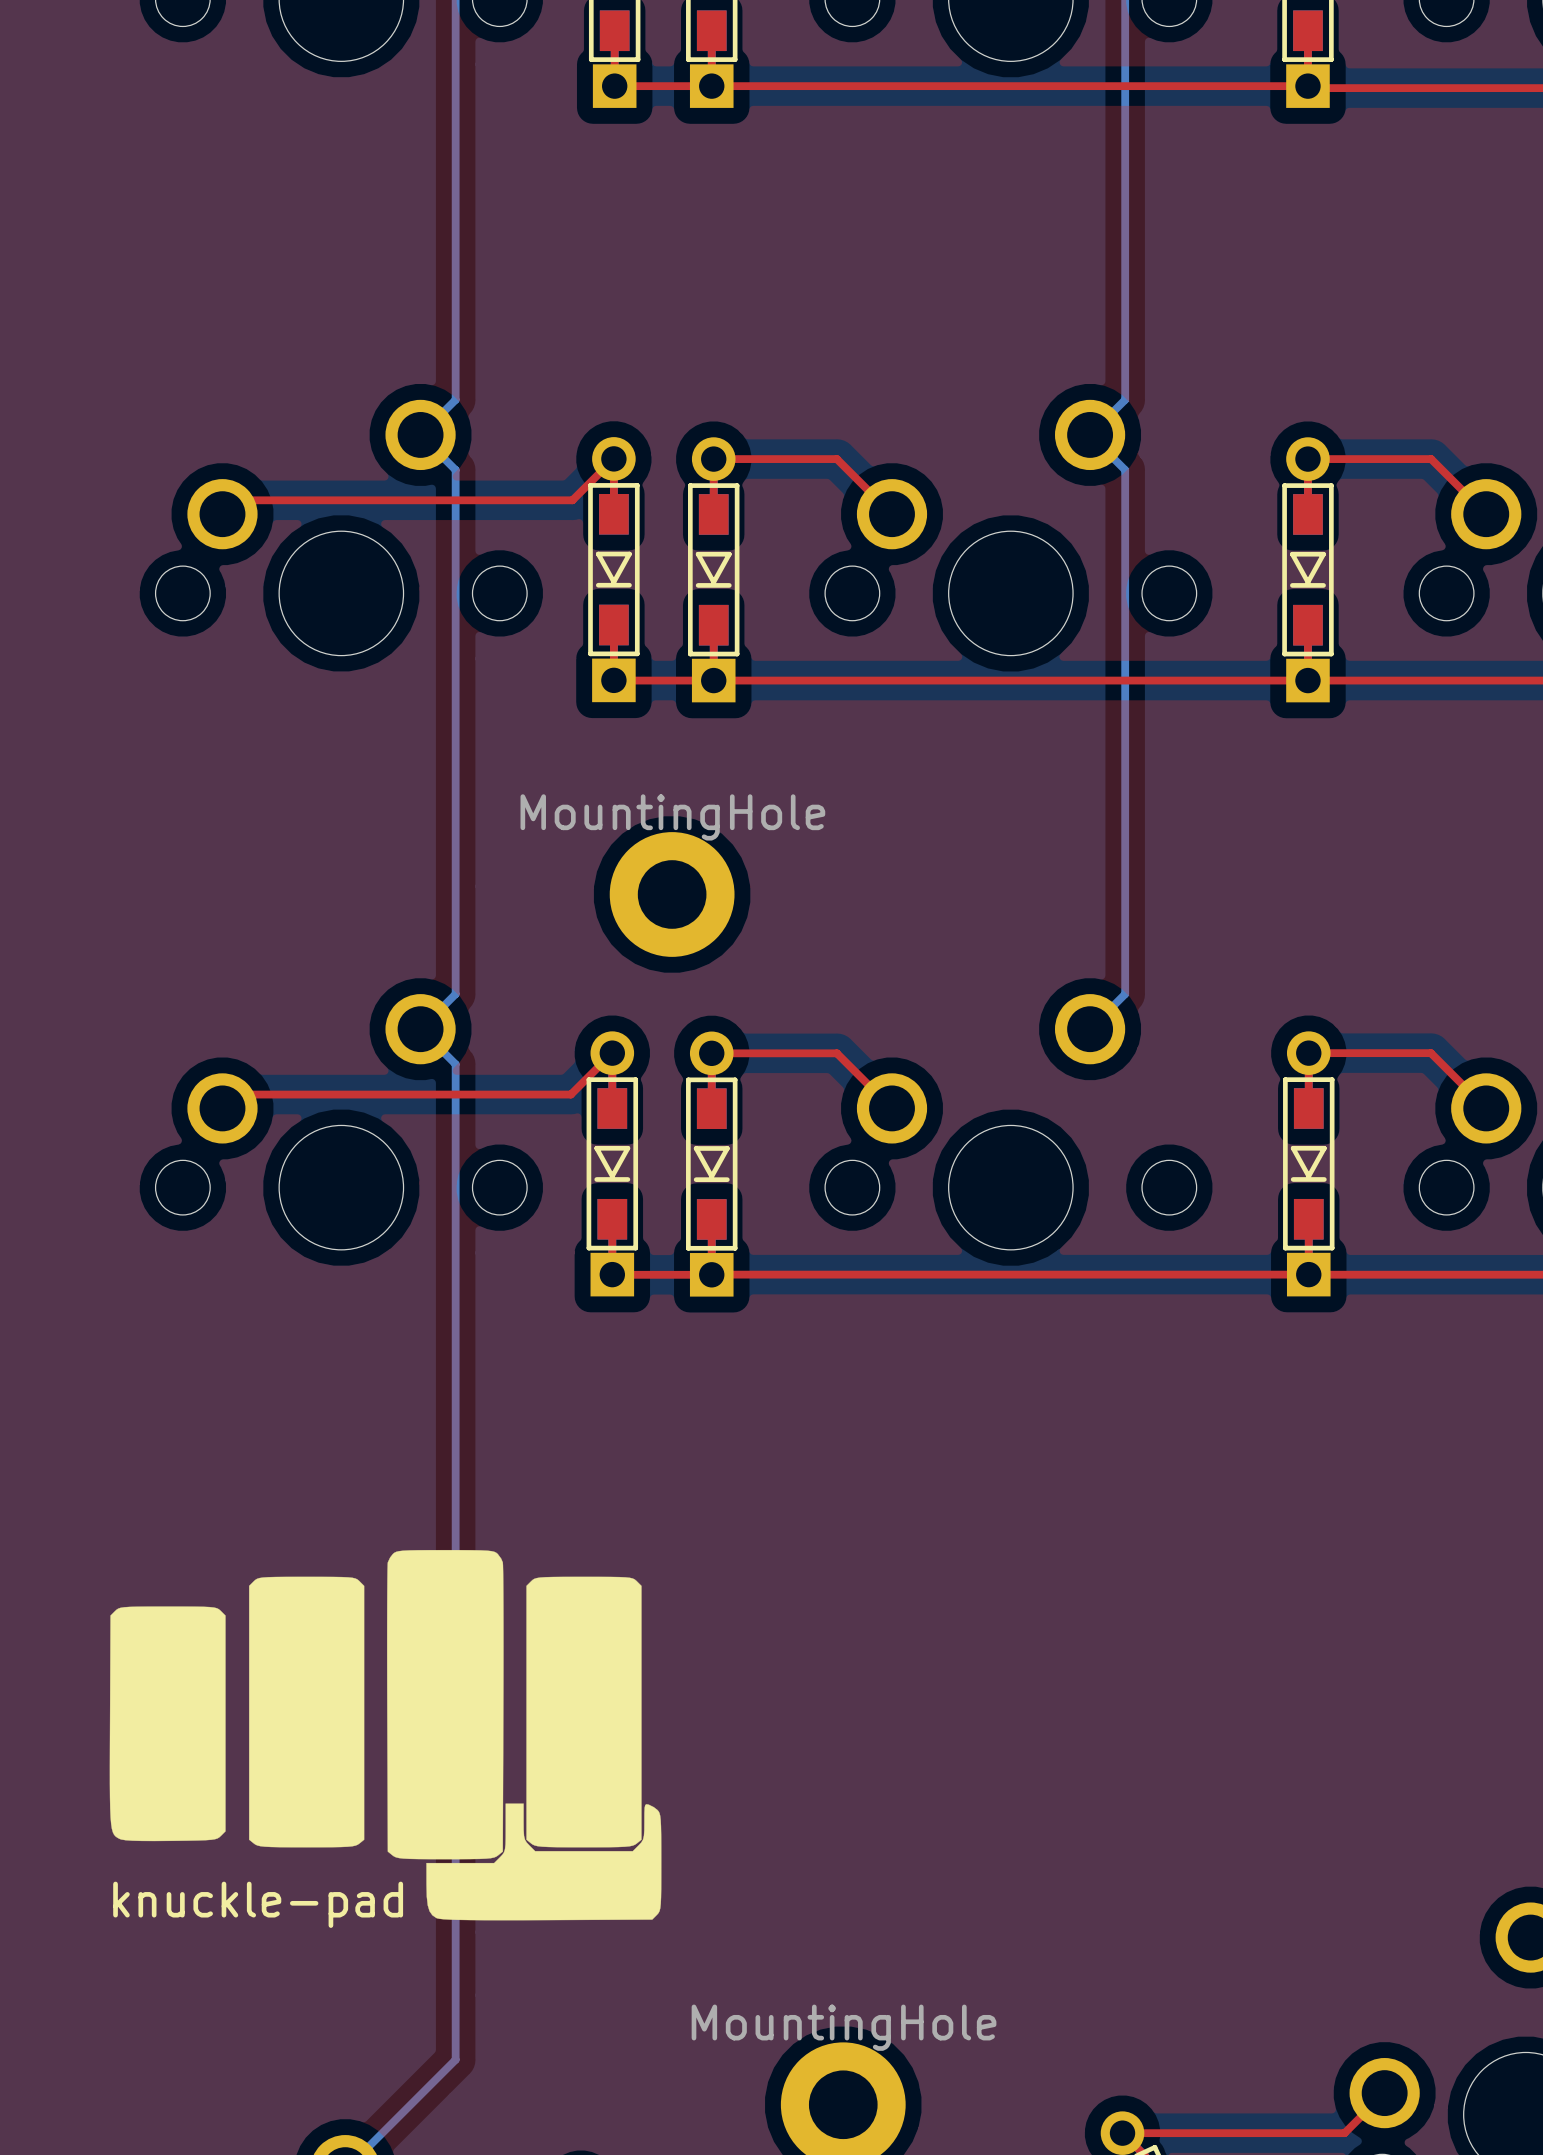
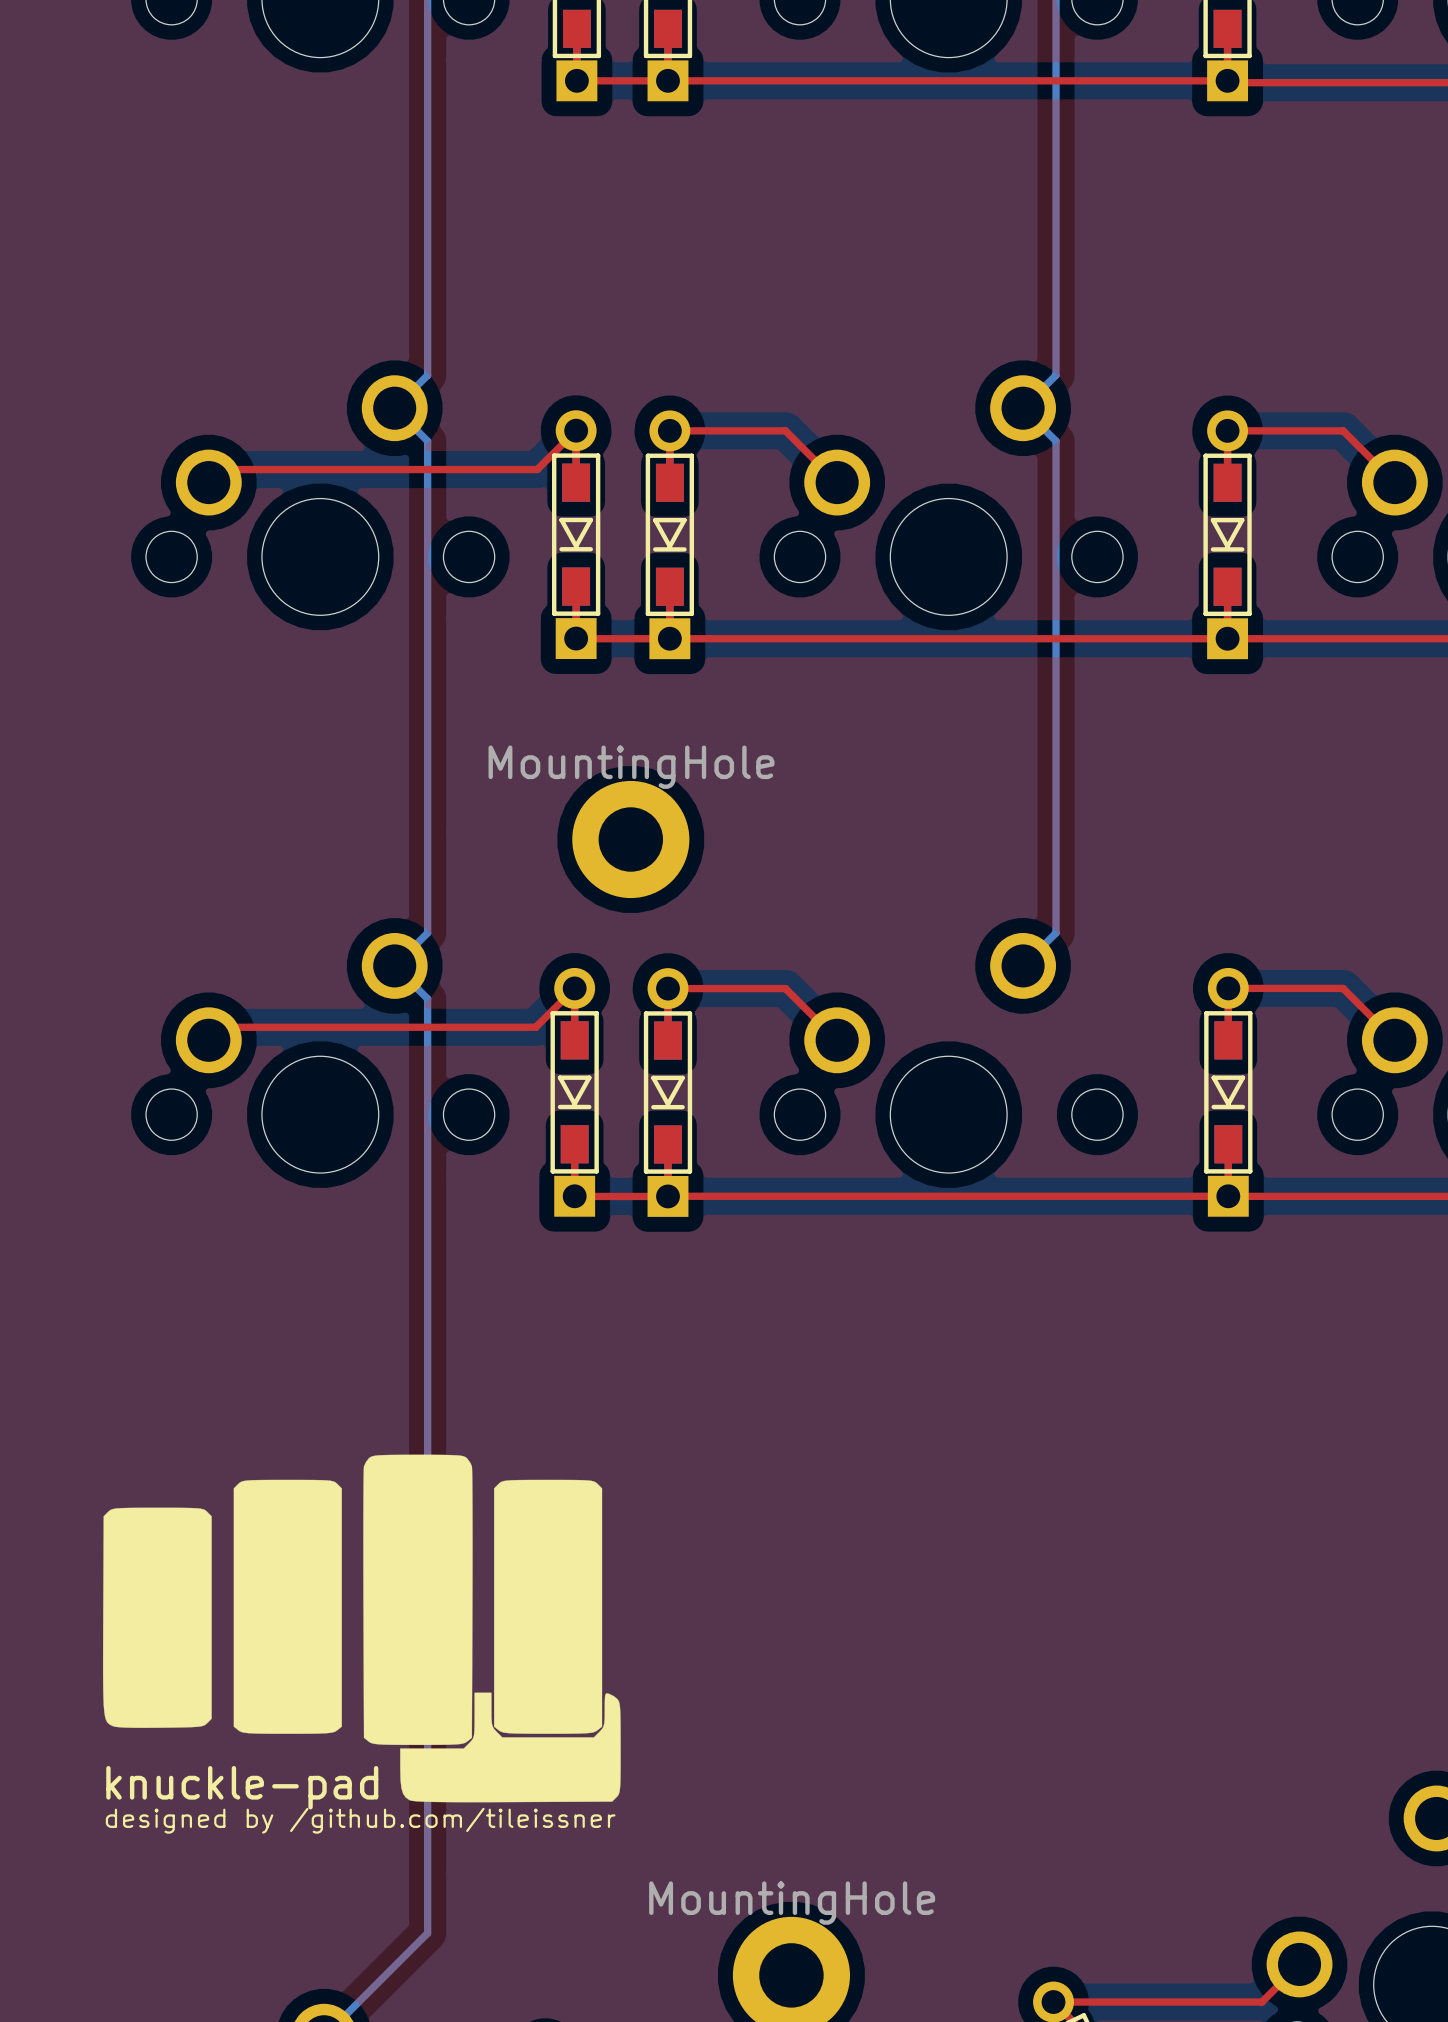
text: none -> designed by /github.com/tileissner (360, 1820)

